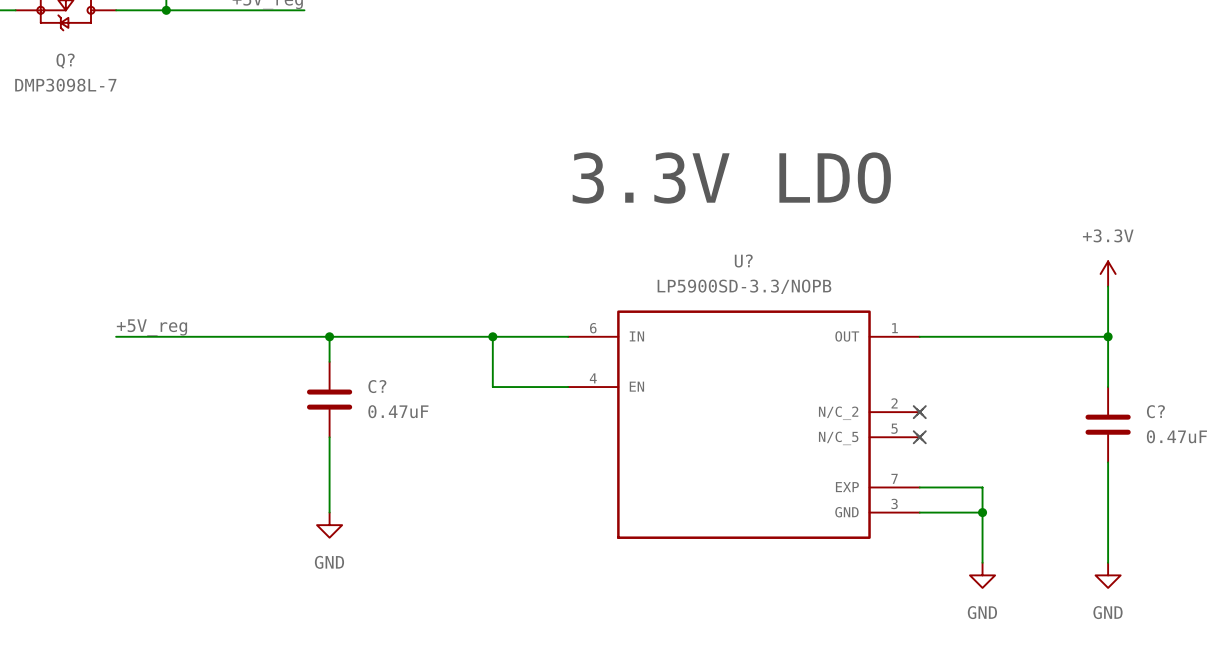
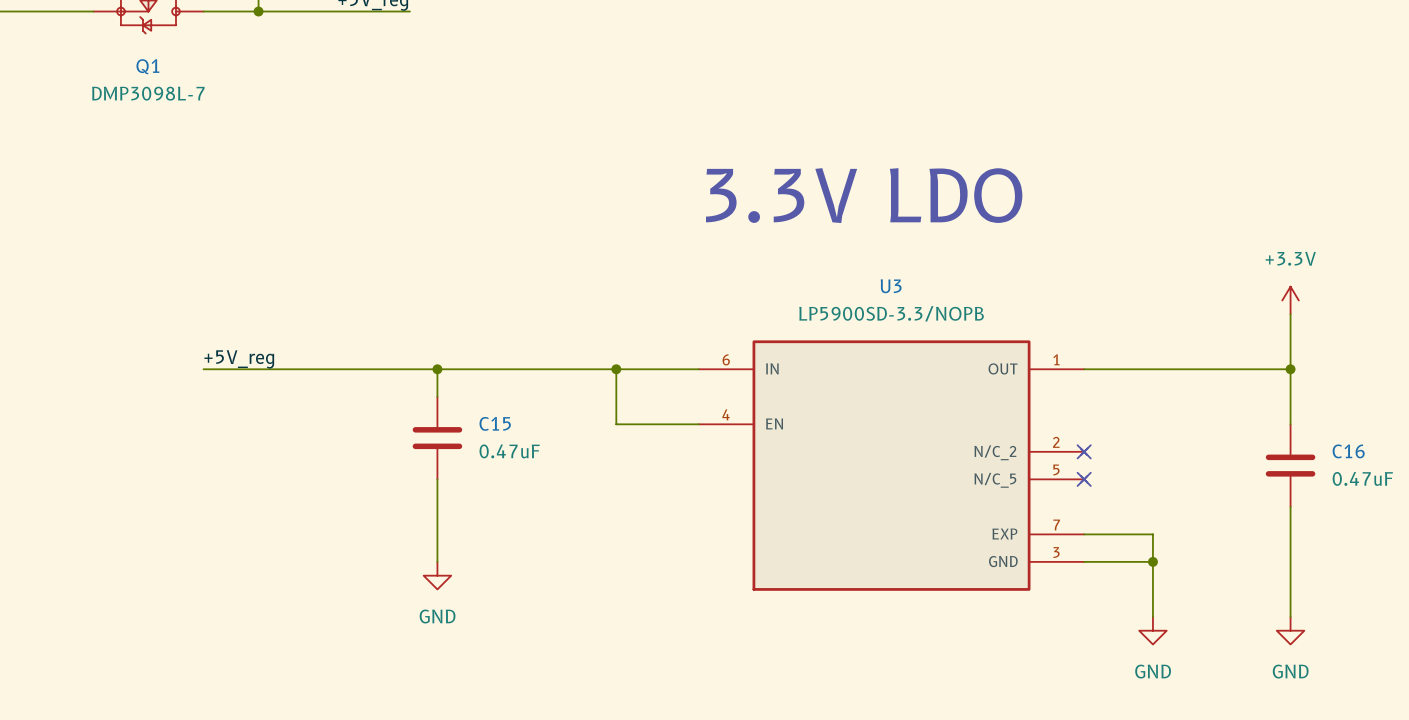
Q? name: Q? (65, 61) -> Q1 (147, 66)
U? name: U? (743, 260) -> U3 (891, 286)
C? name: C? (377, 386) -> C15 (495, 423)
C? name: C? (1155, 411) -> C16 (1348, 451)

